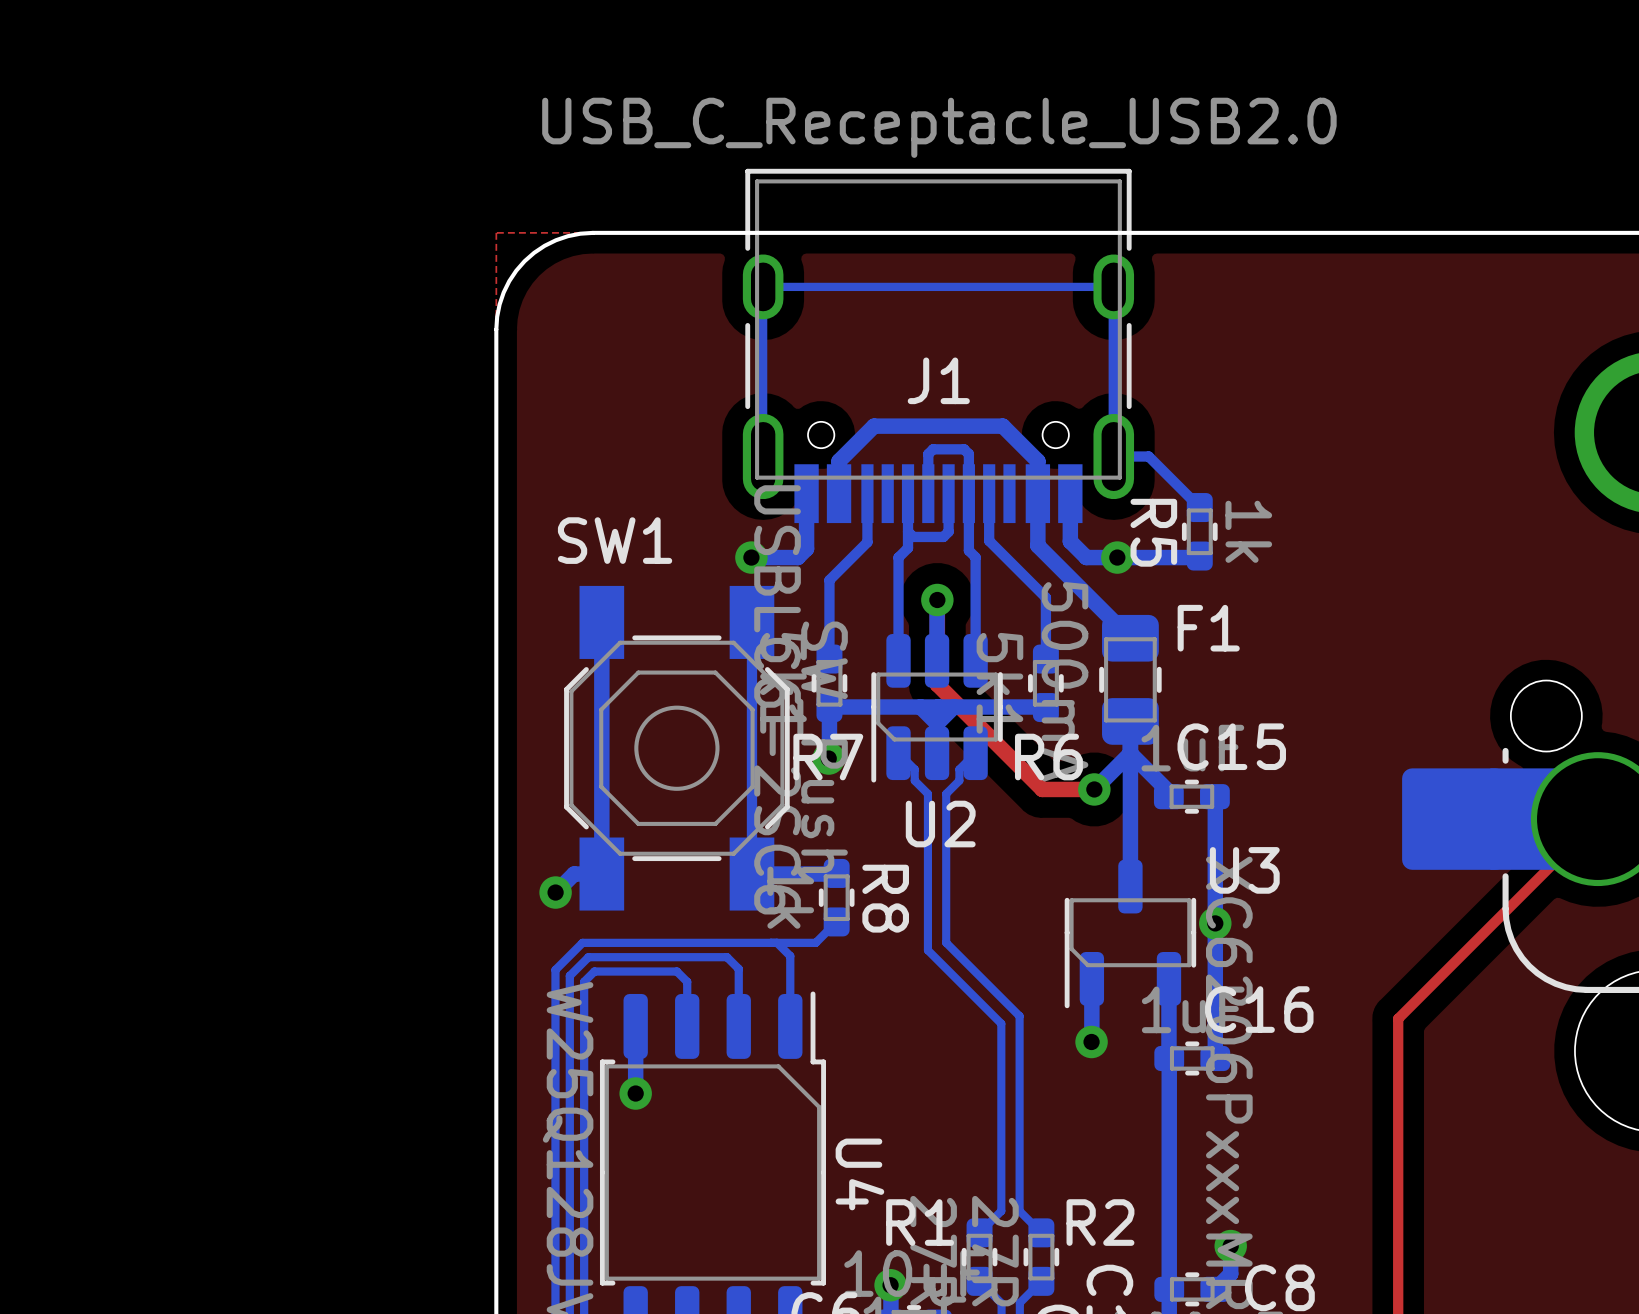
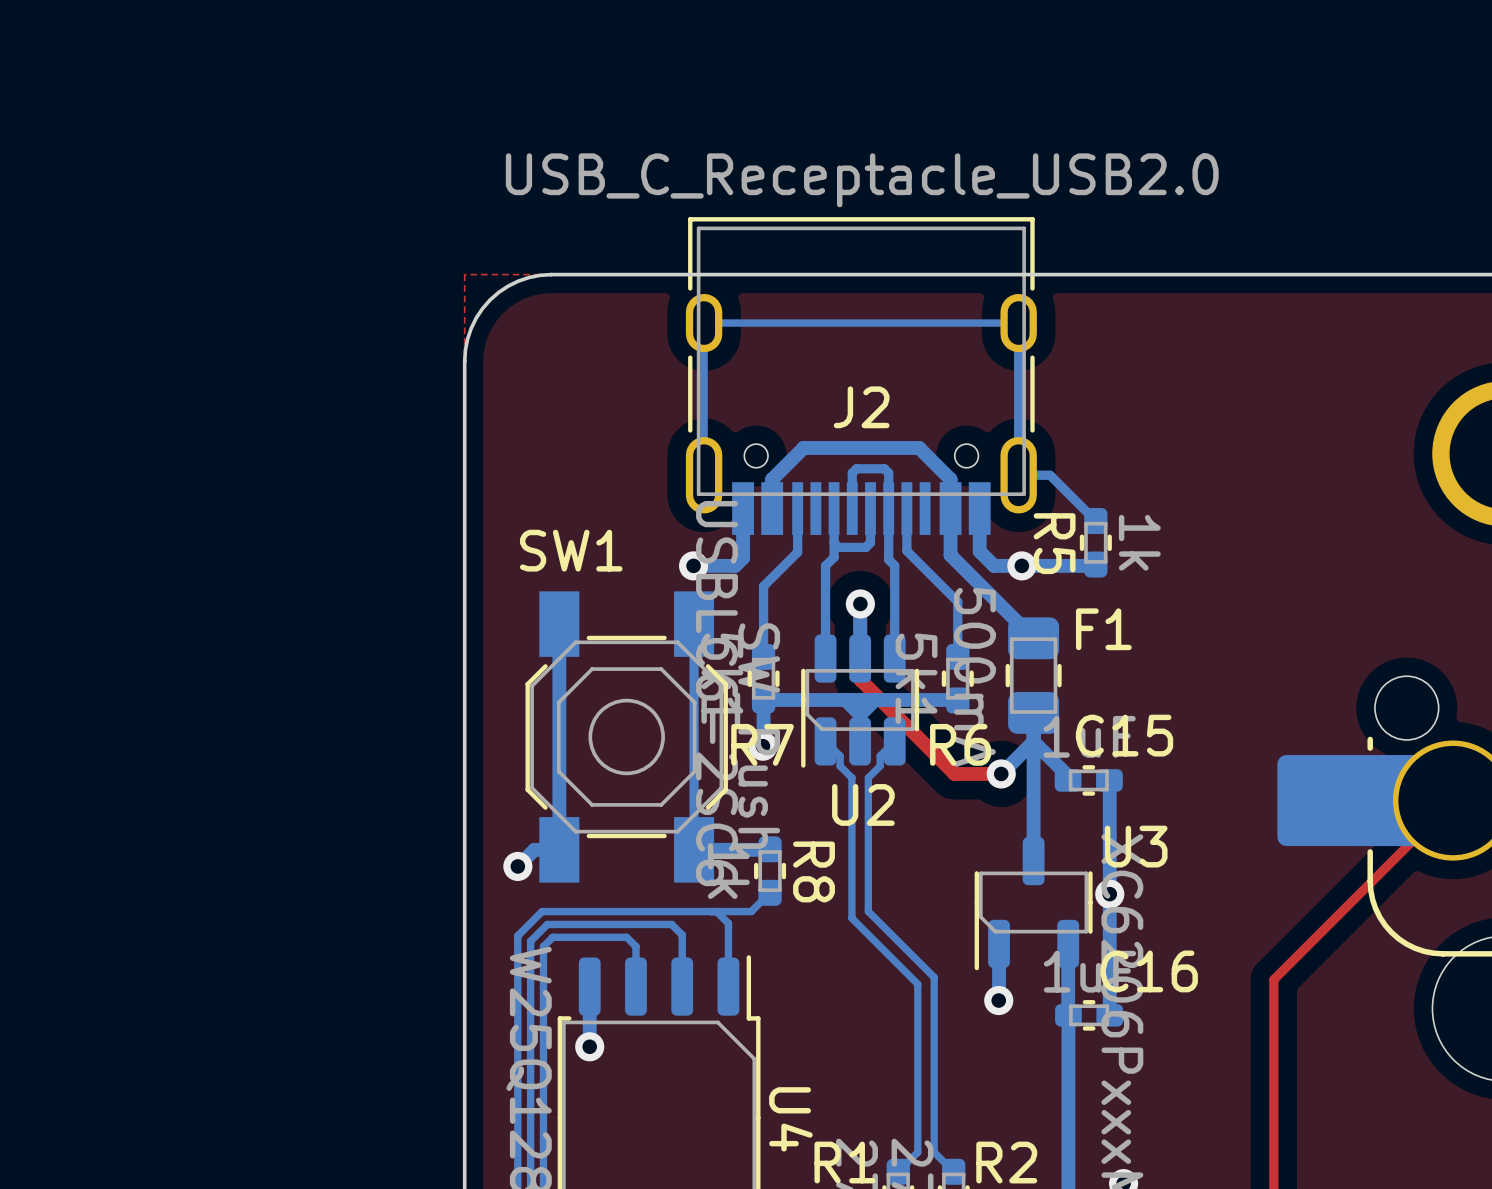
J1 name: J1 (938, 380) -> J2 (861, 407)

